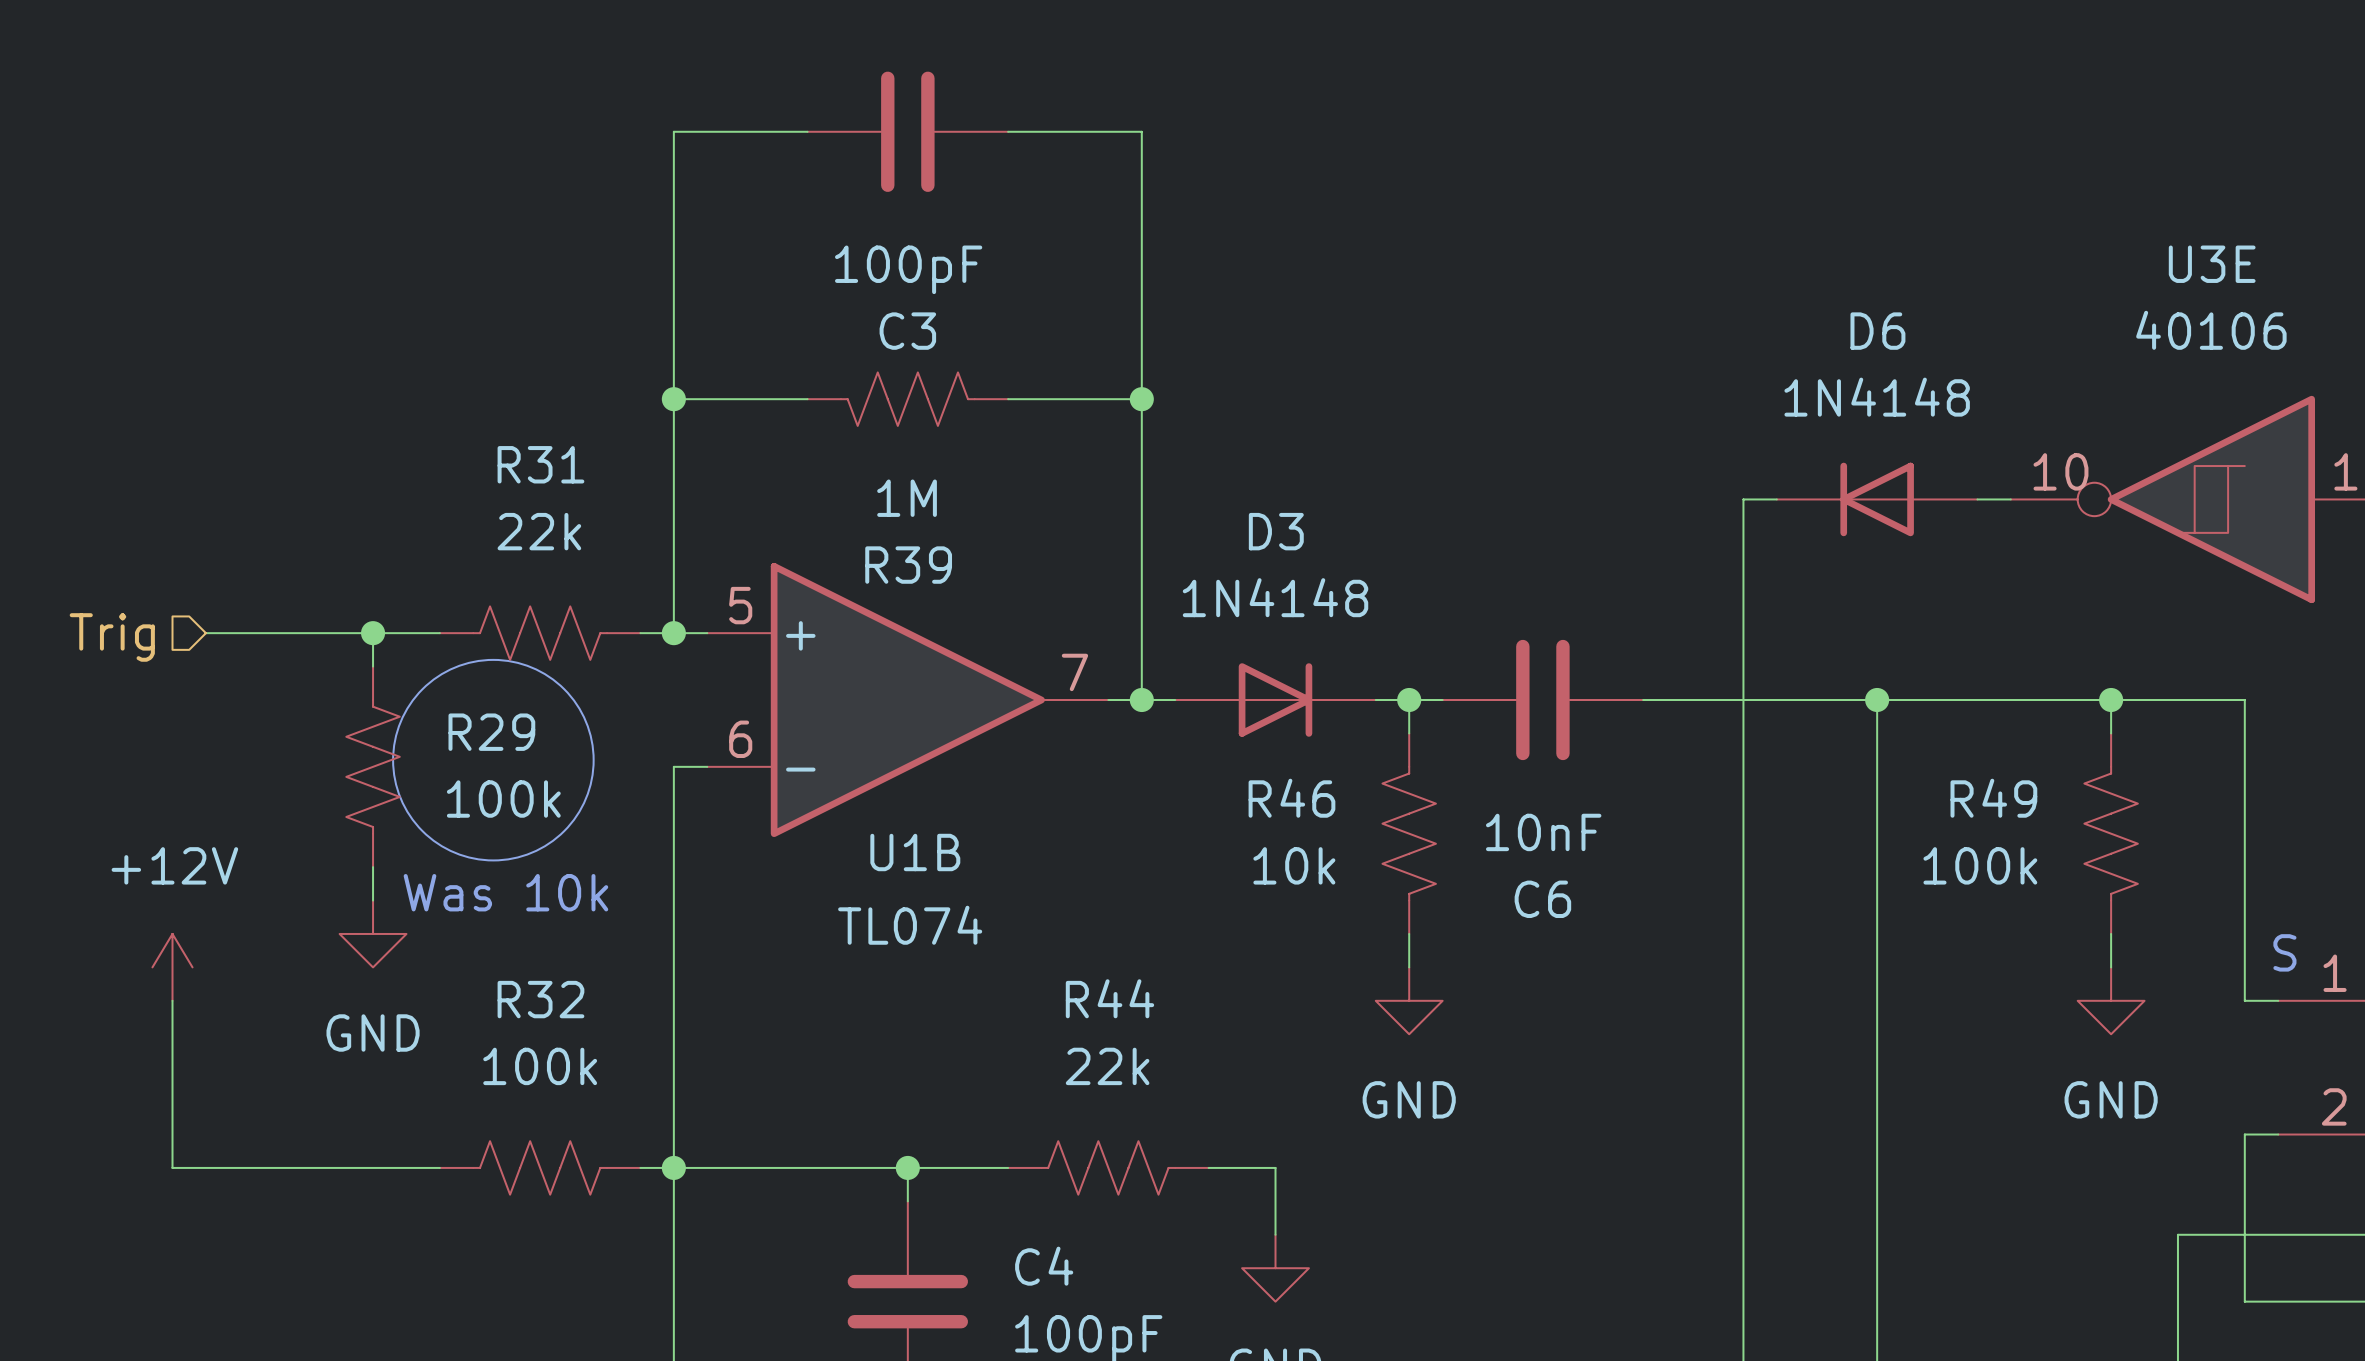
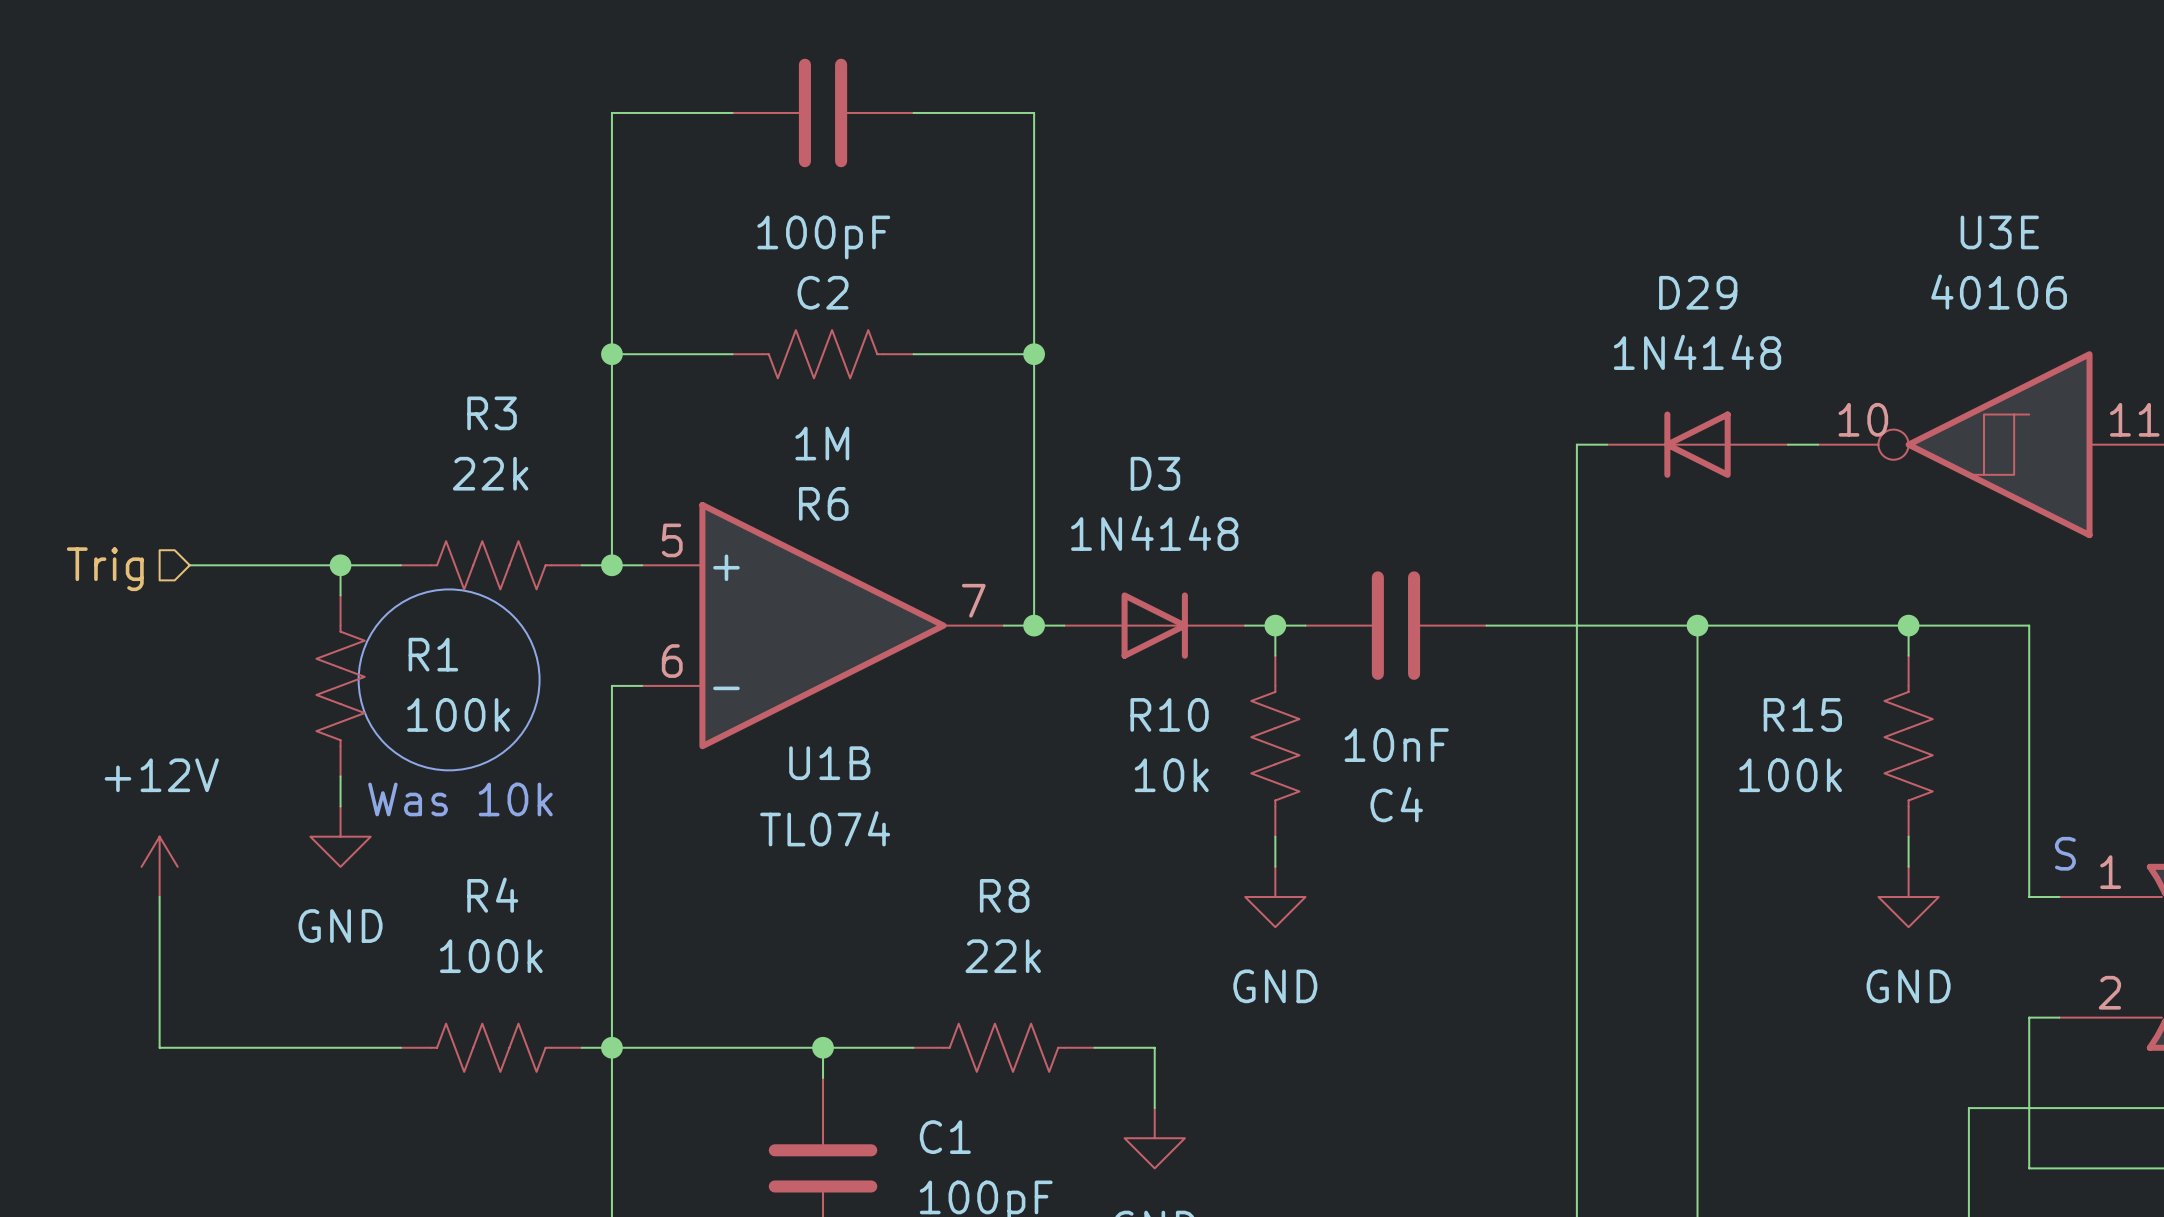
C3 name: C3 (907, 331) -> C2 (823, 292)
D6 name: D6 (1877, 331) -> D29 (1698, 292)
R31 name: R31 (540, 464) -> R3 (492, 413)
R39 name: R39 (908, 565) -> R6 (823, 503)
R29 name: R29 (491, 732) -> R1 (433, 654)
R46 name: R46 (1291, 798) -> R10 (1169, 714)
R49 name: R49 (1993, 798) -> R15 (1802, 714)
C6 name: C6 (1542, 899) -> C4 (1396, 804)
R44 name: R44 (1109, 998) -> R8 (1004, 895)
R32 name: R32 (540, 999) -> R4 (492, 895)
C4 name: C4 (1044, 1266) -> C1 (945, 1137)

